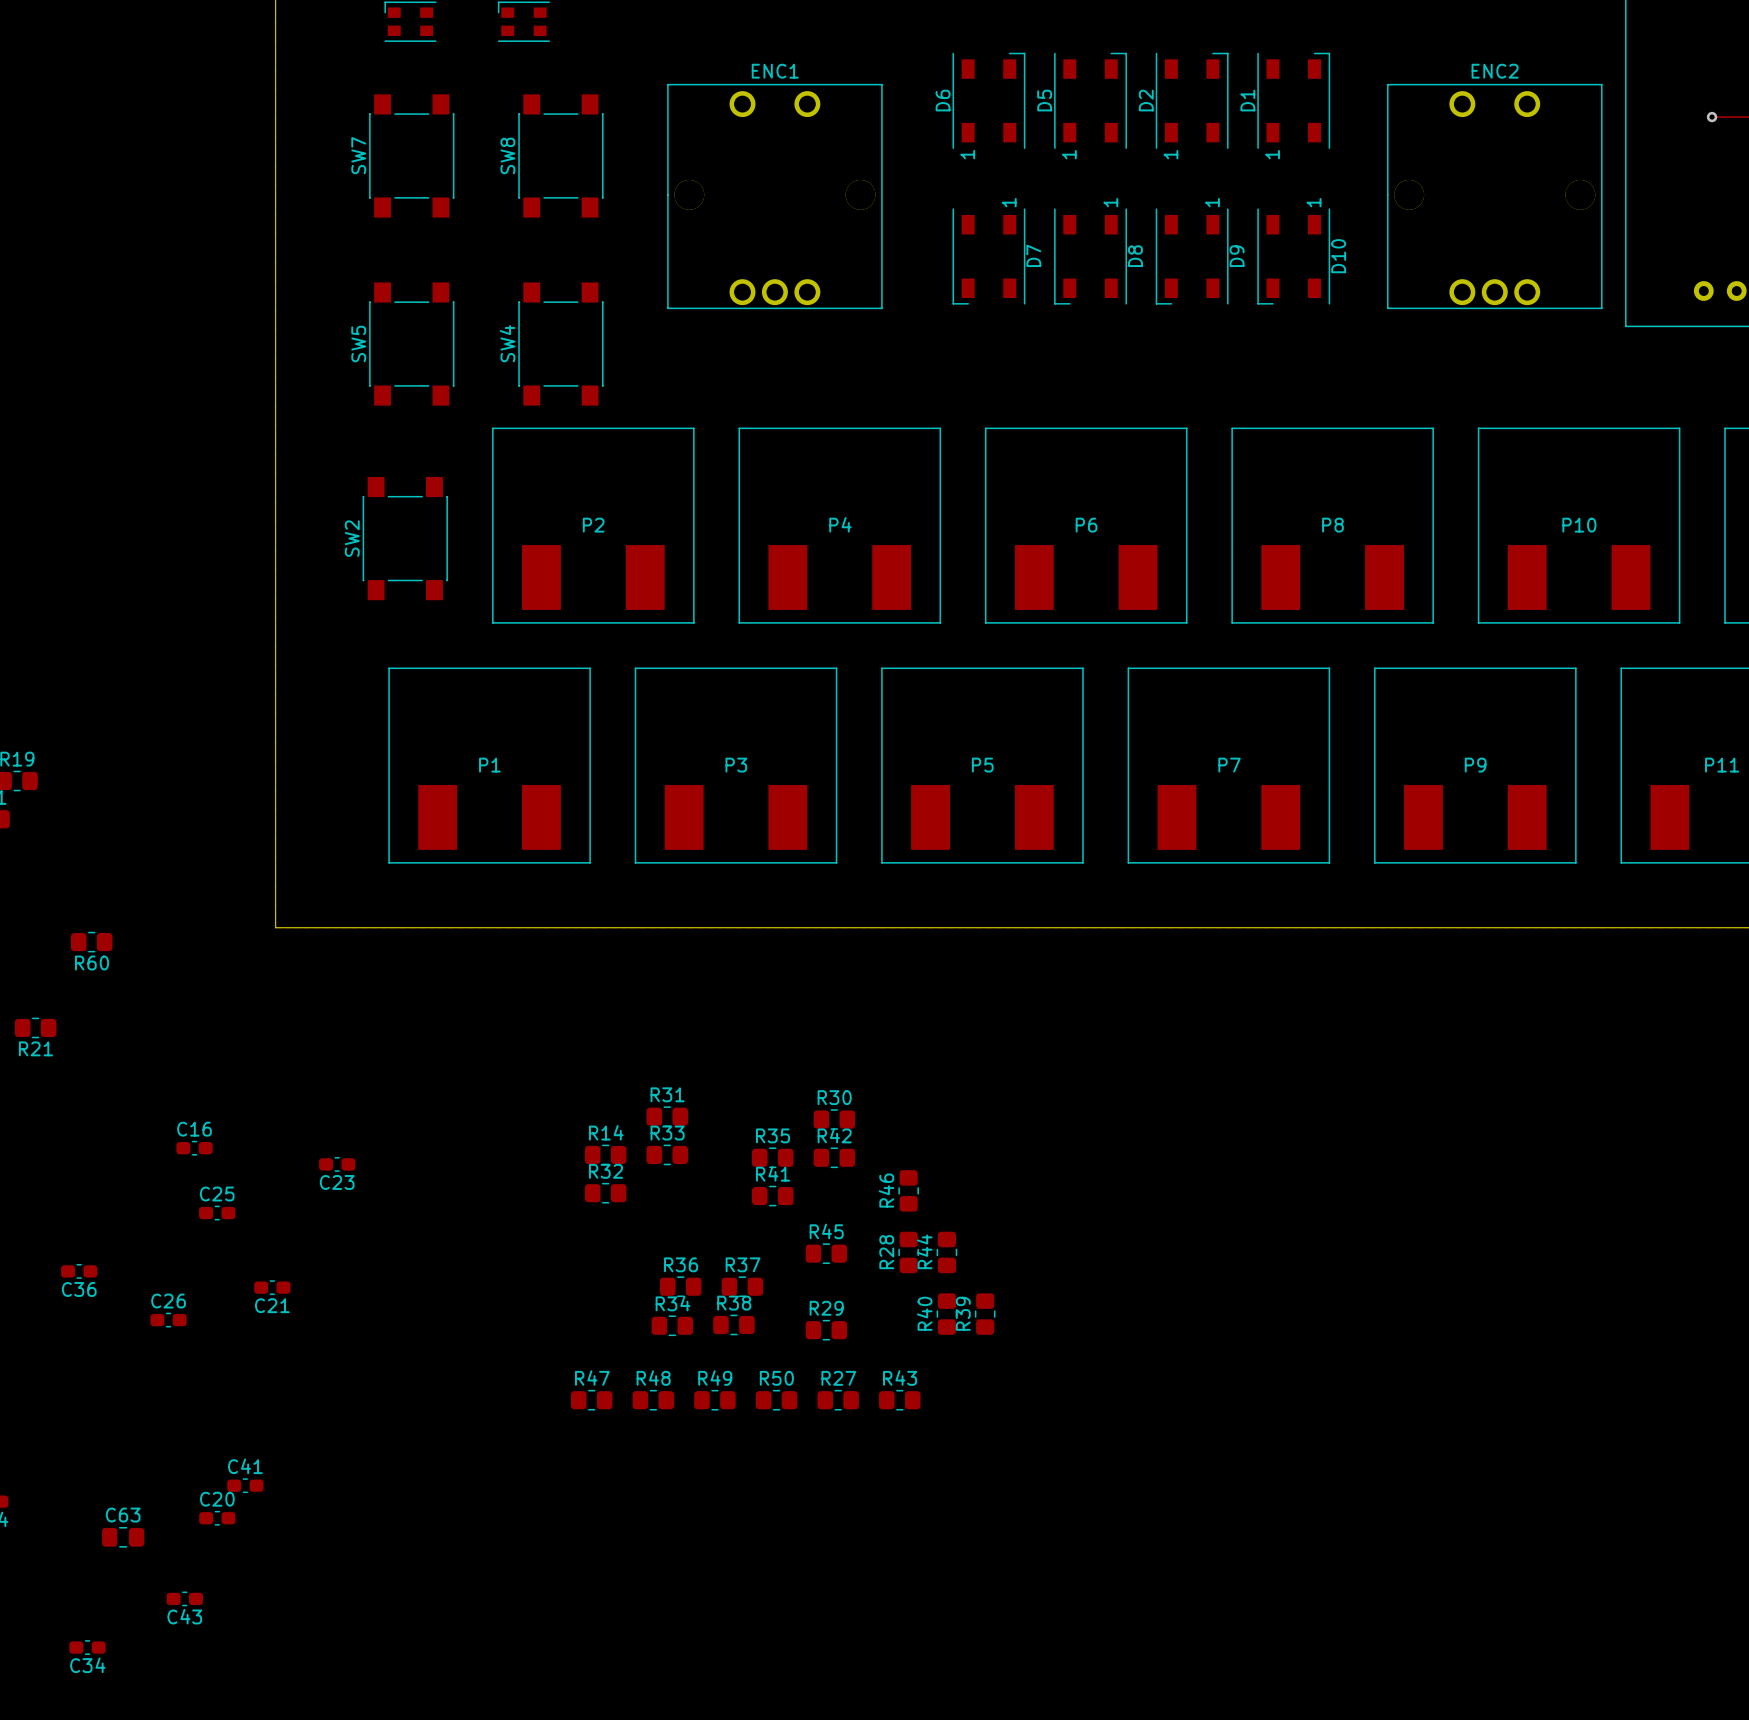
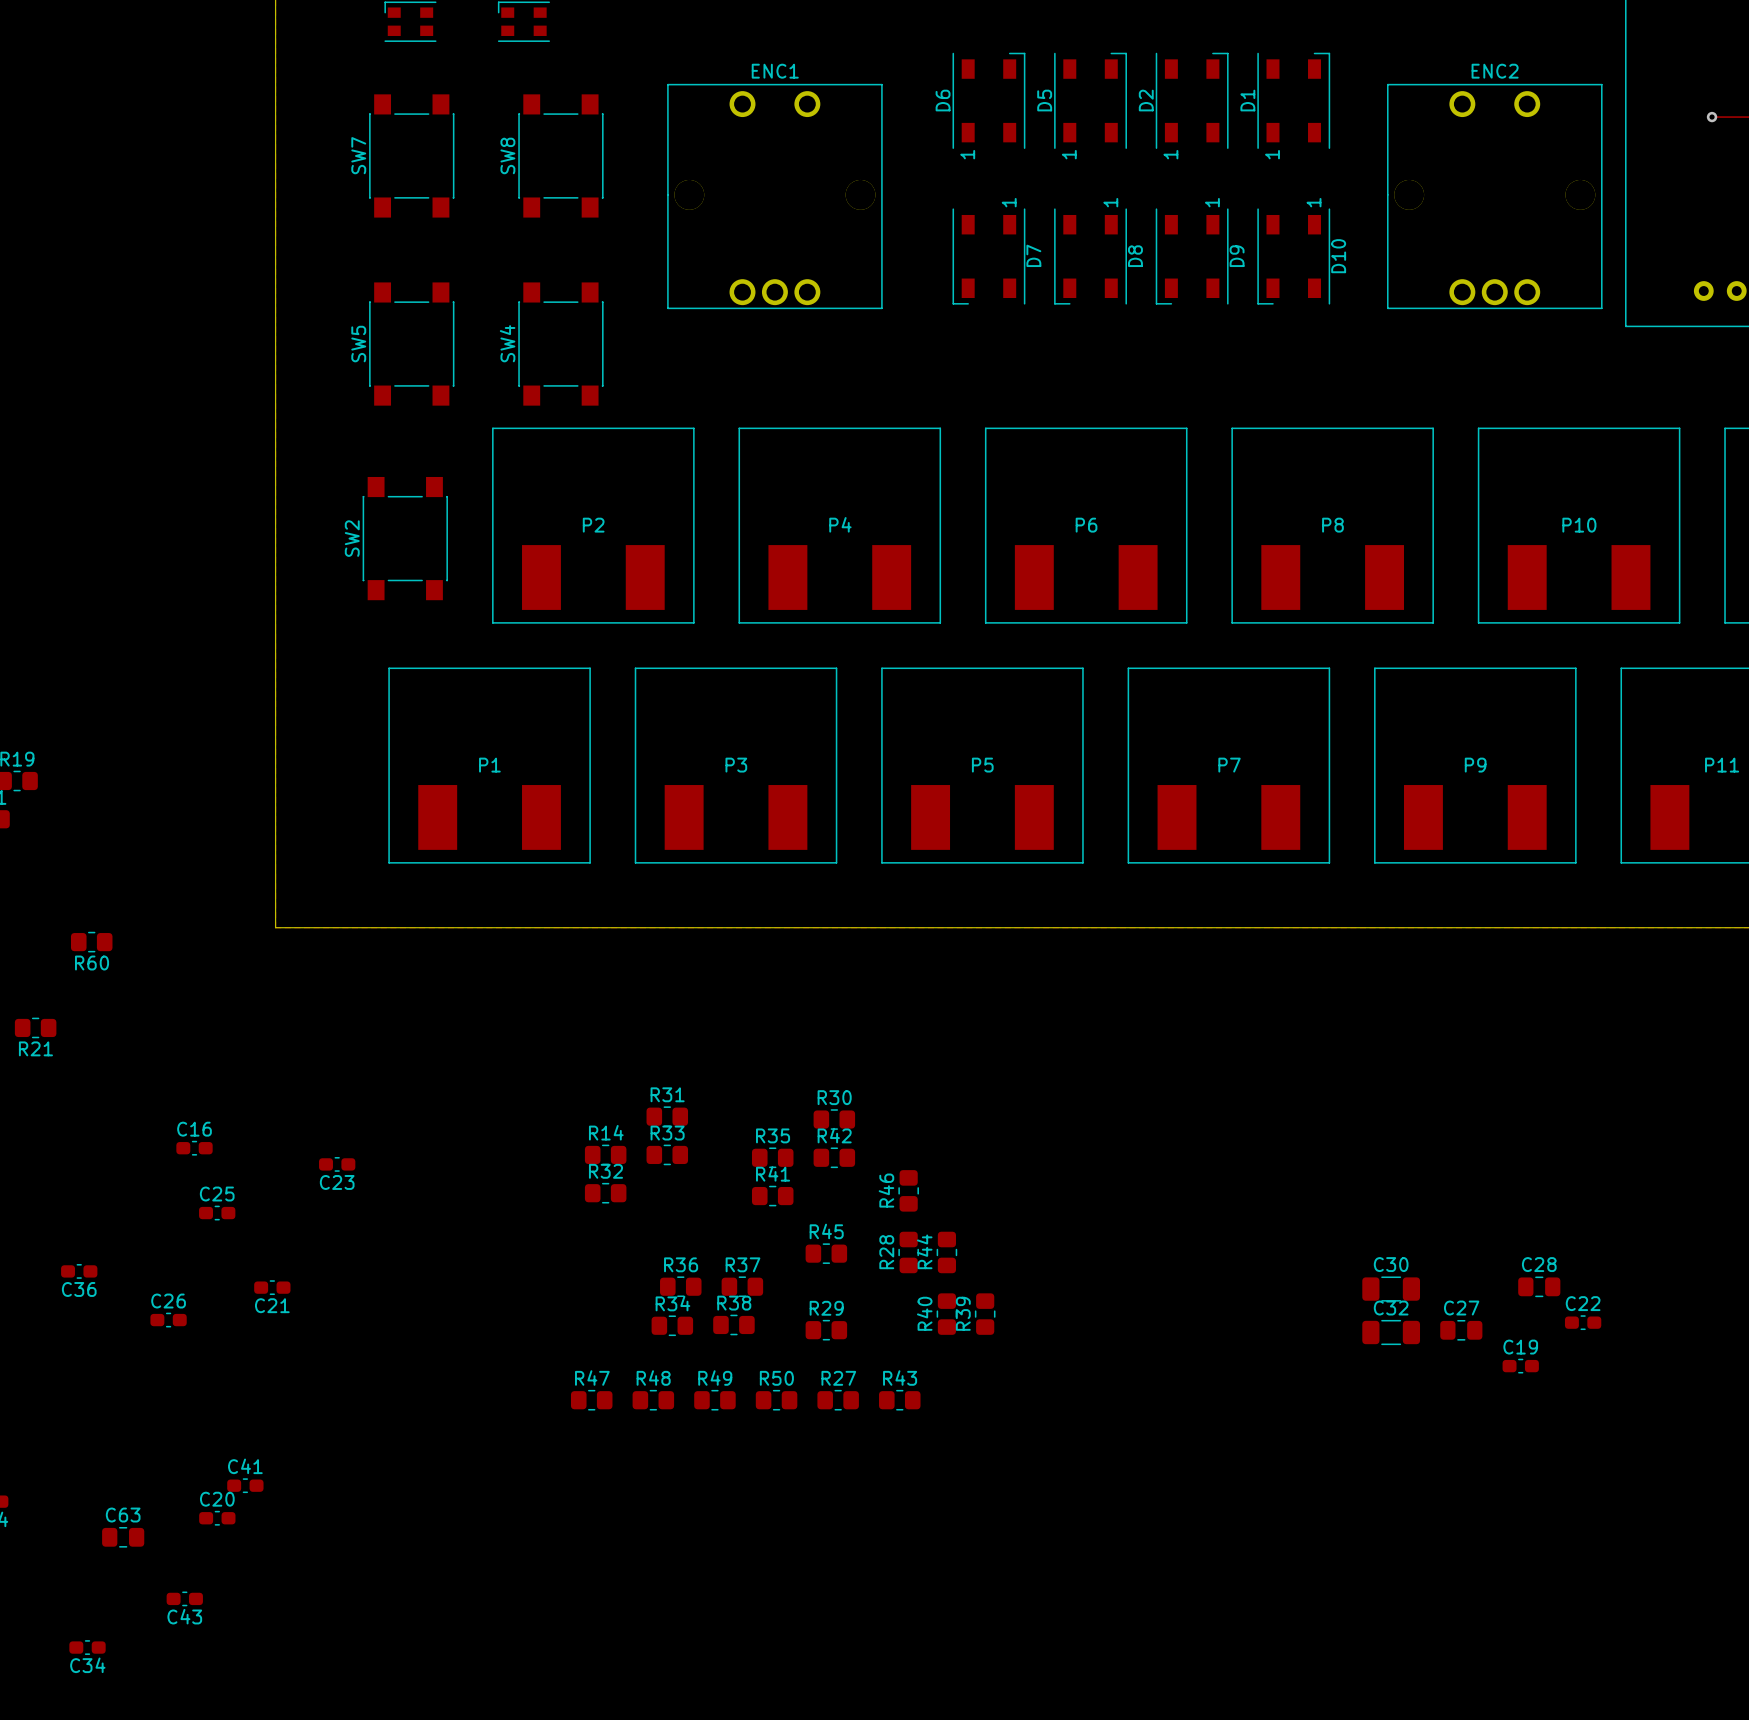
C28: none -> (1539, 1286)
C30: none -> (1391, 1289)
C22: none -> (1583, 1322)
C27: none -> (1461, 1330)
C32: none -> (1391, 1332)
C19: none -> (1520, 1366)

